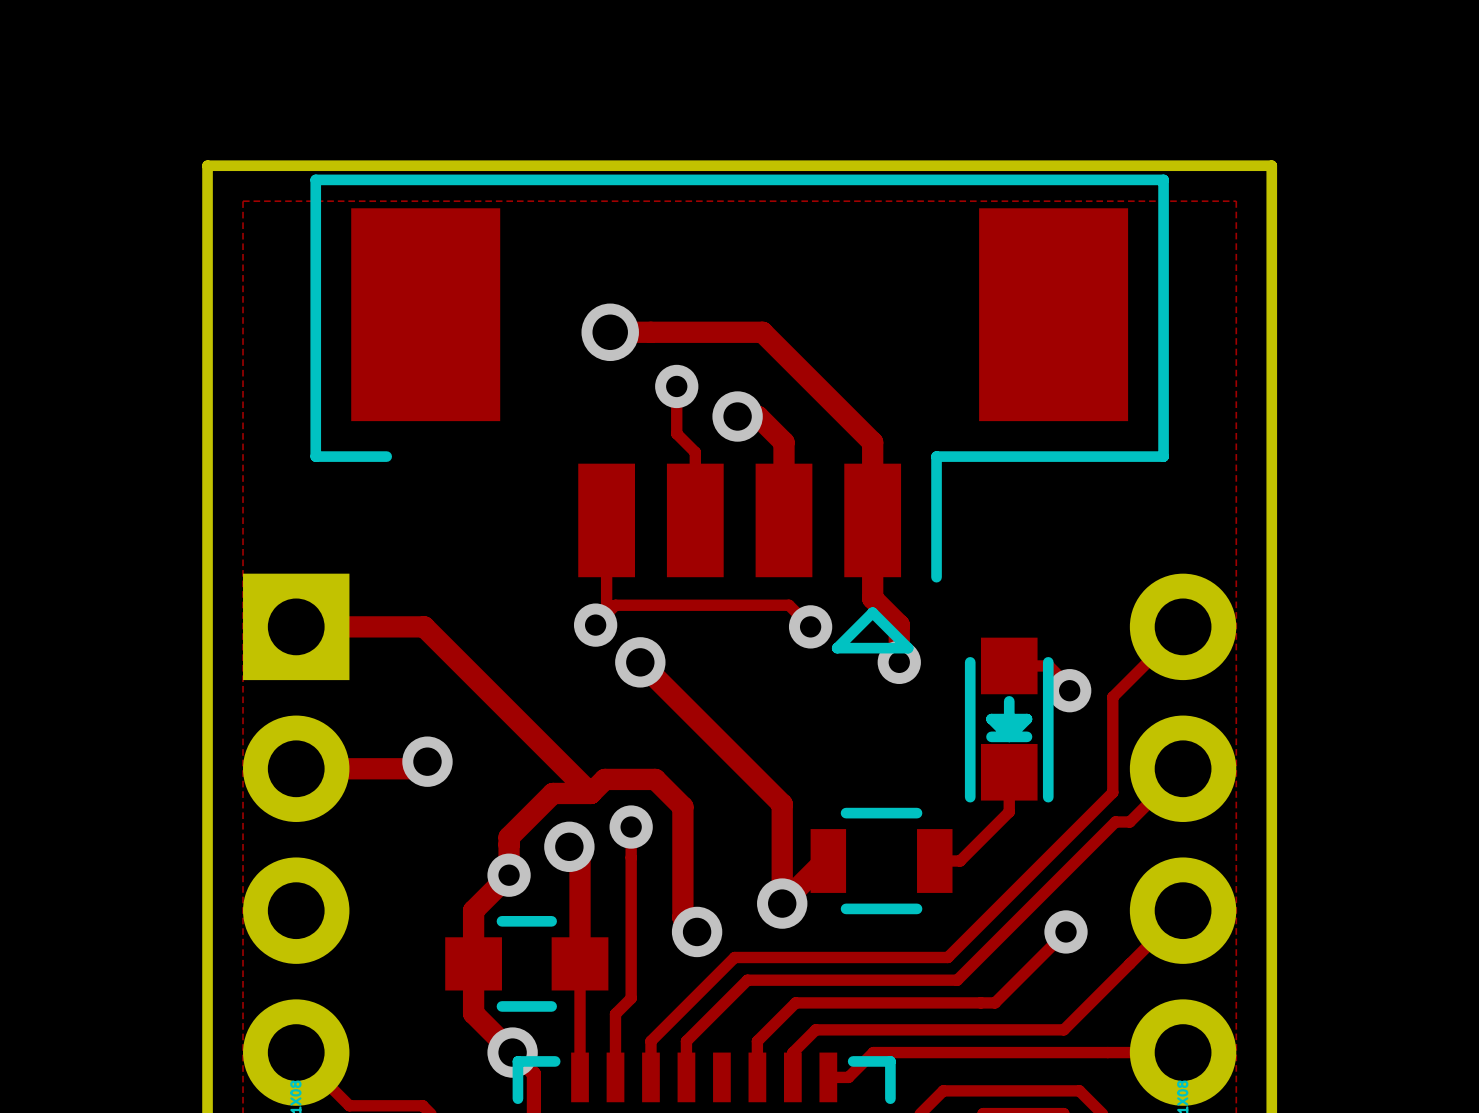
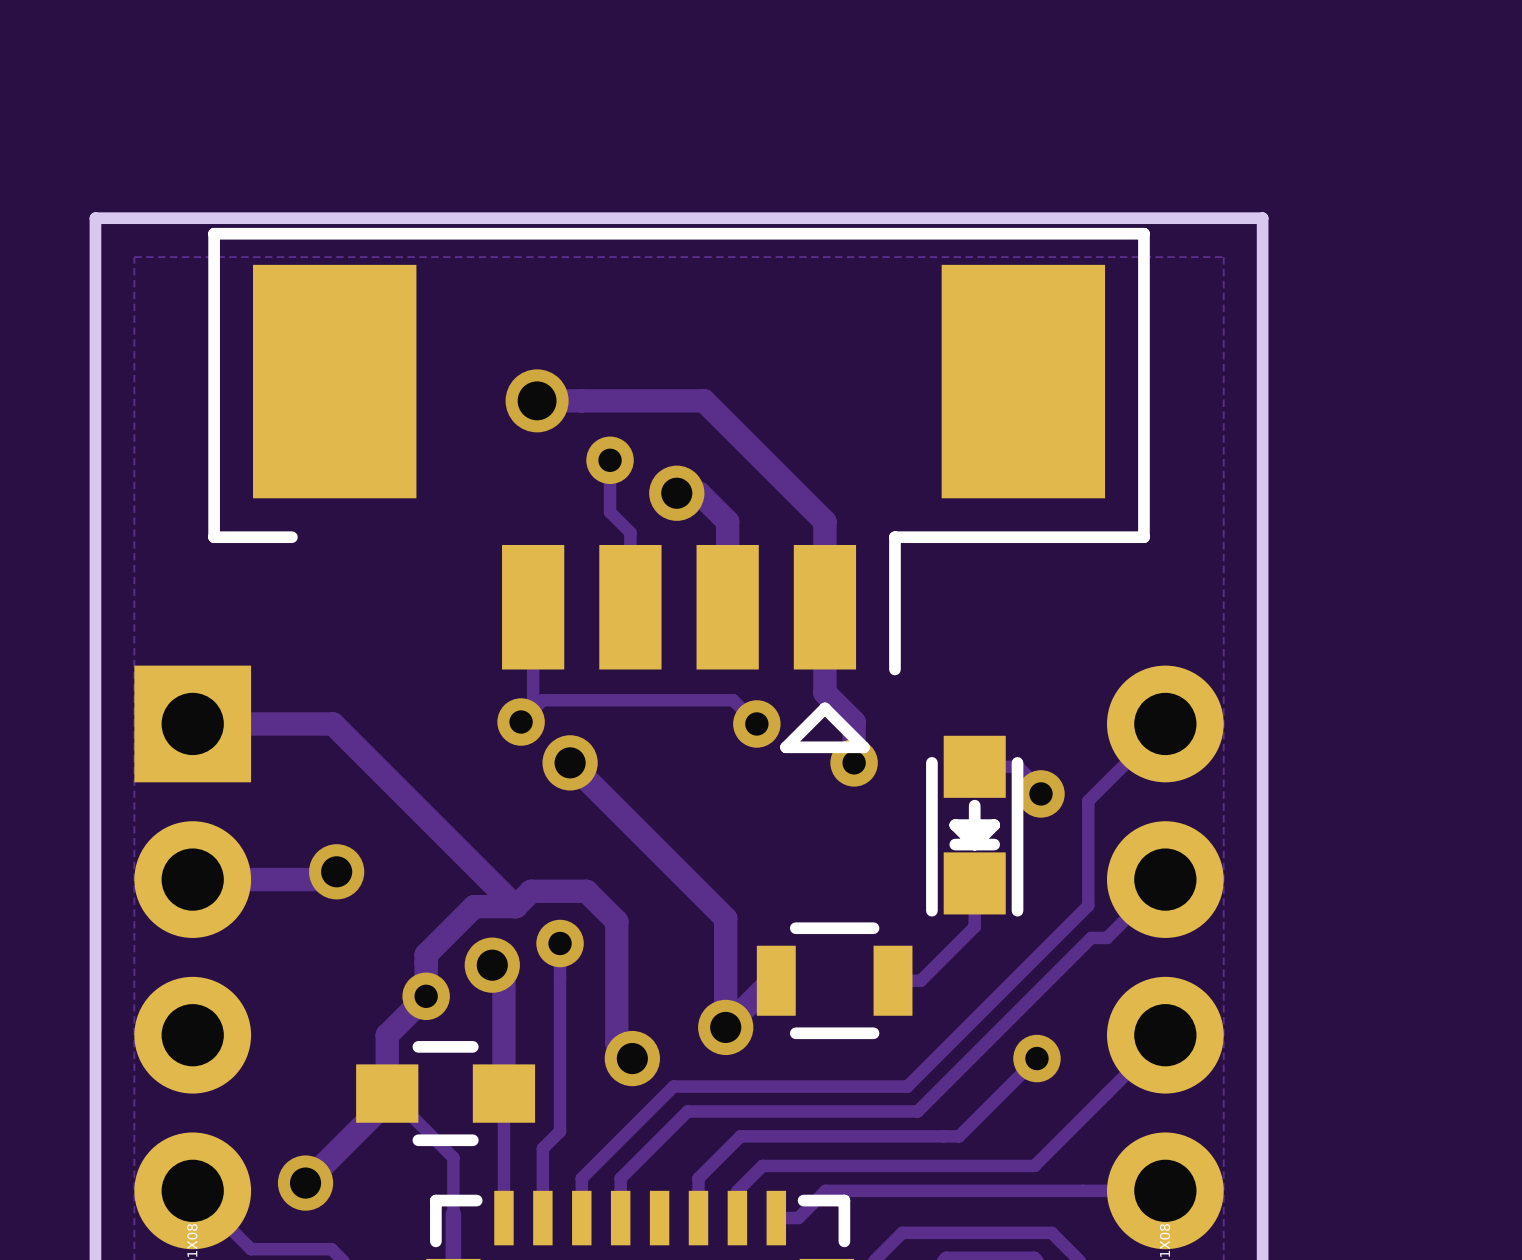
track: (473, 970) (473, 1013) (533, 1073) -> (389, 1093) (453, 1157) (453, 1214)
track: none -> (387, 1101) (305, 1183)
via position: (512, 1052) -> (305, 1183)

